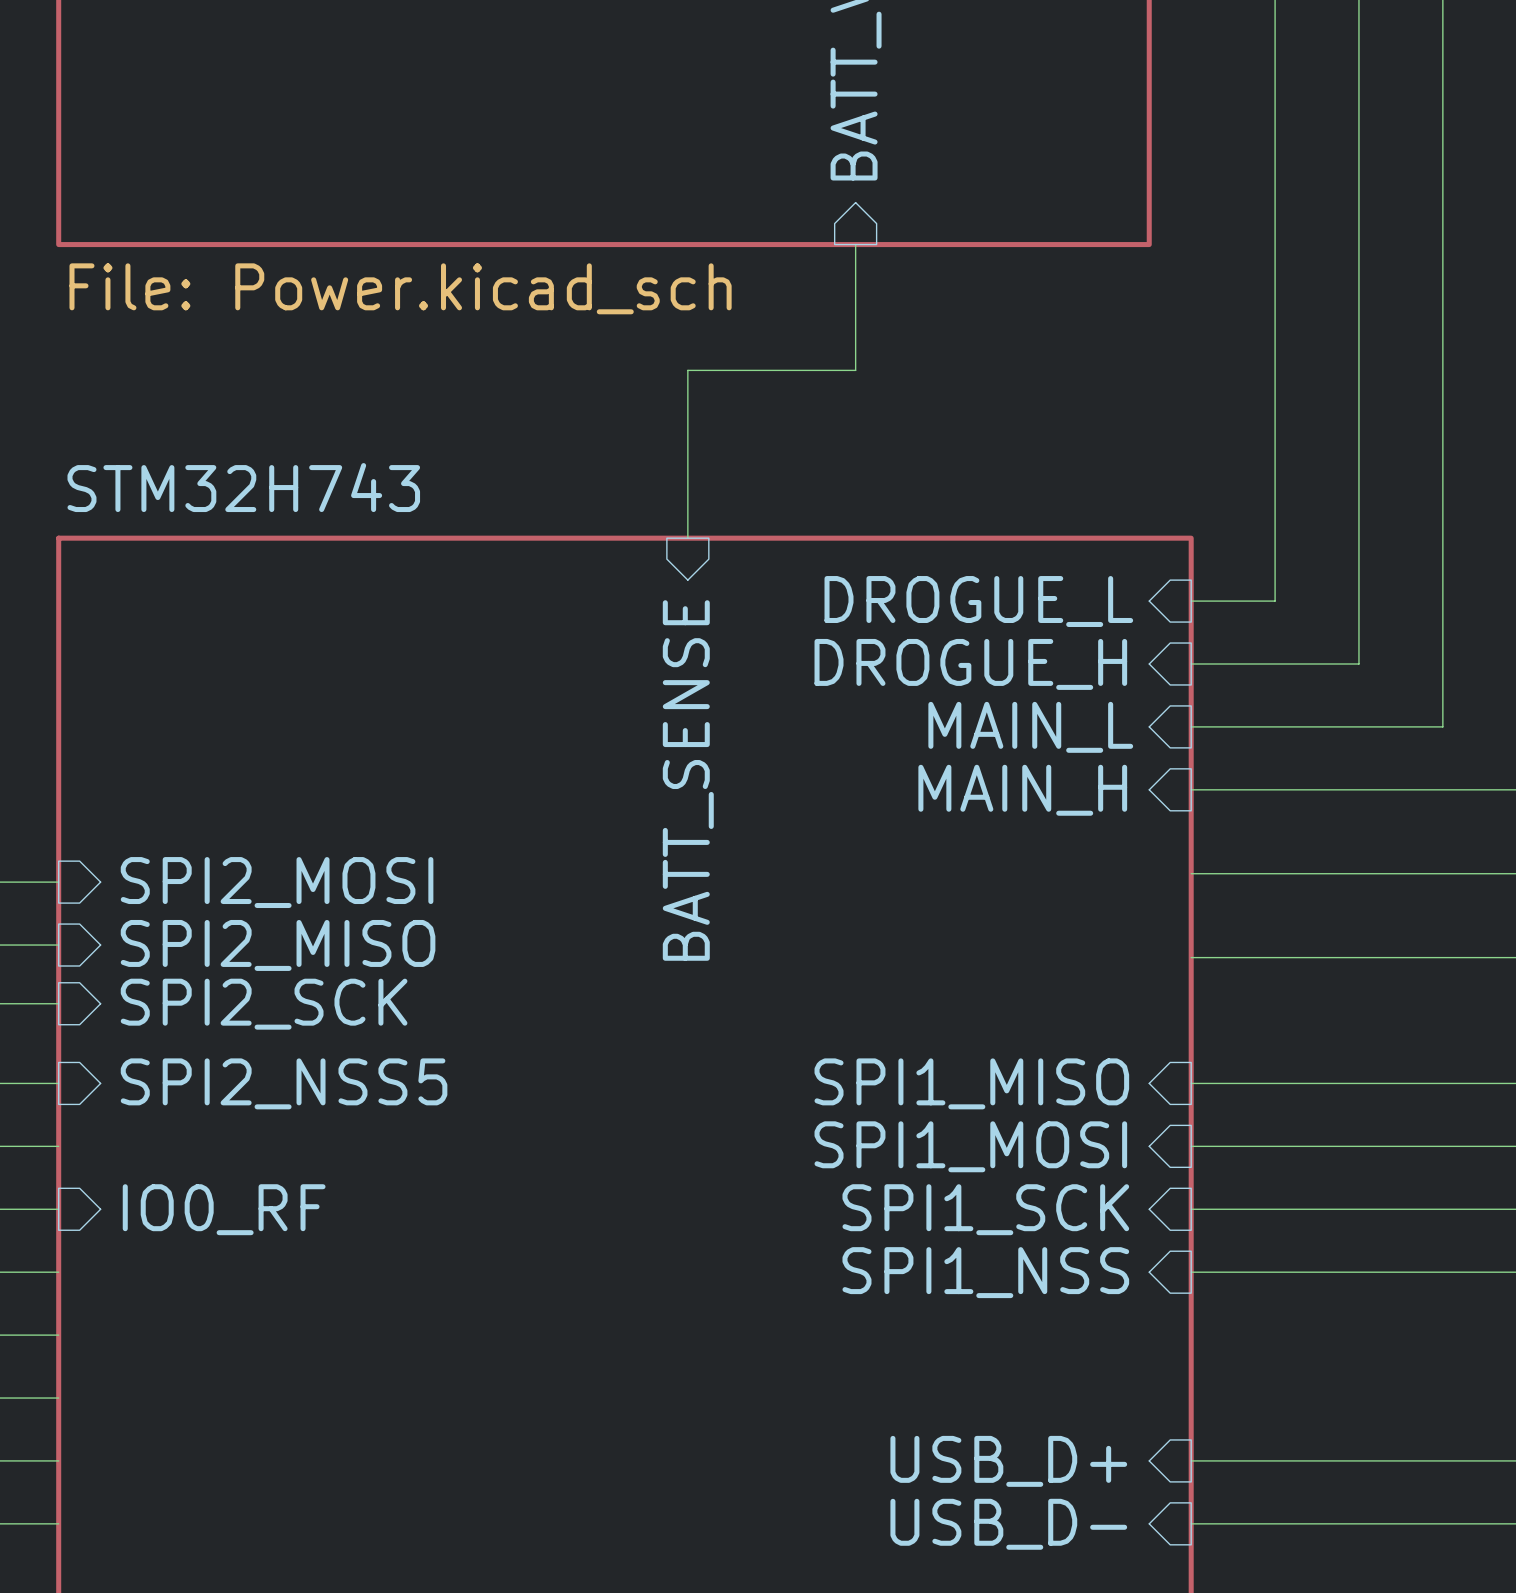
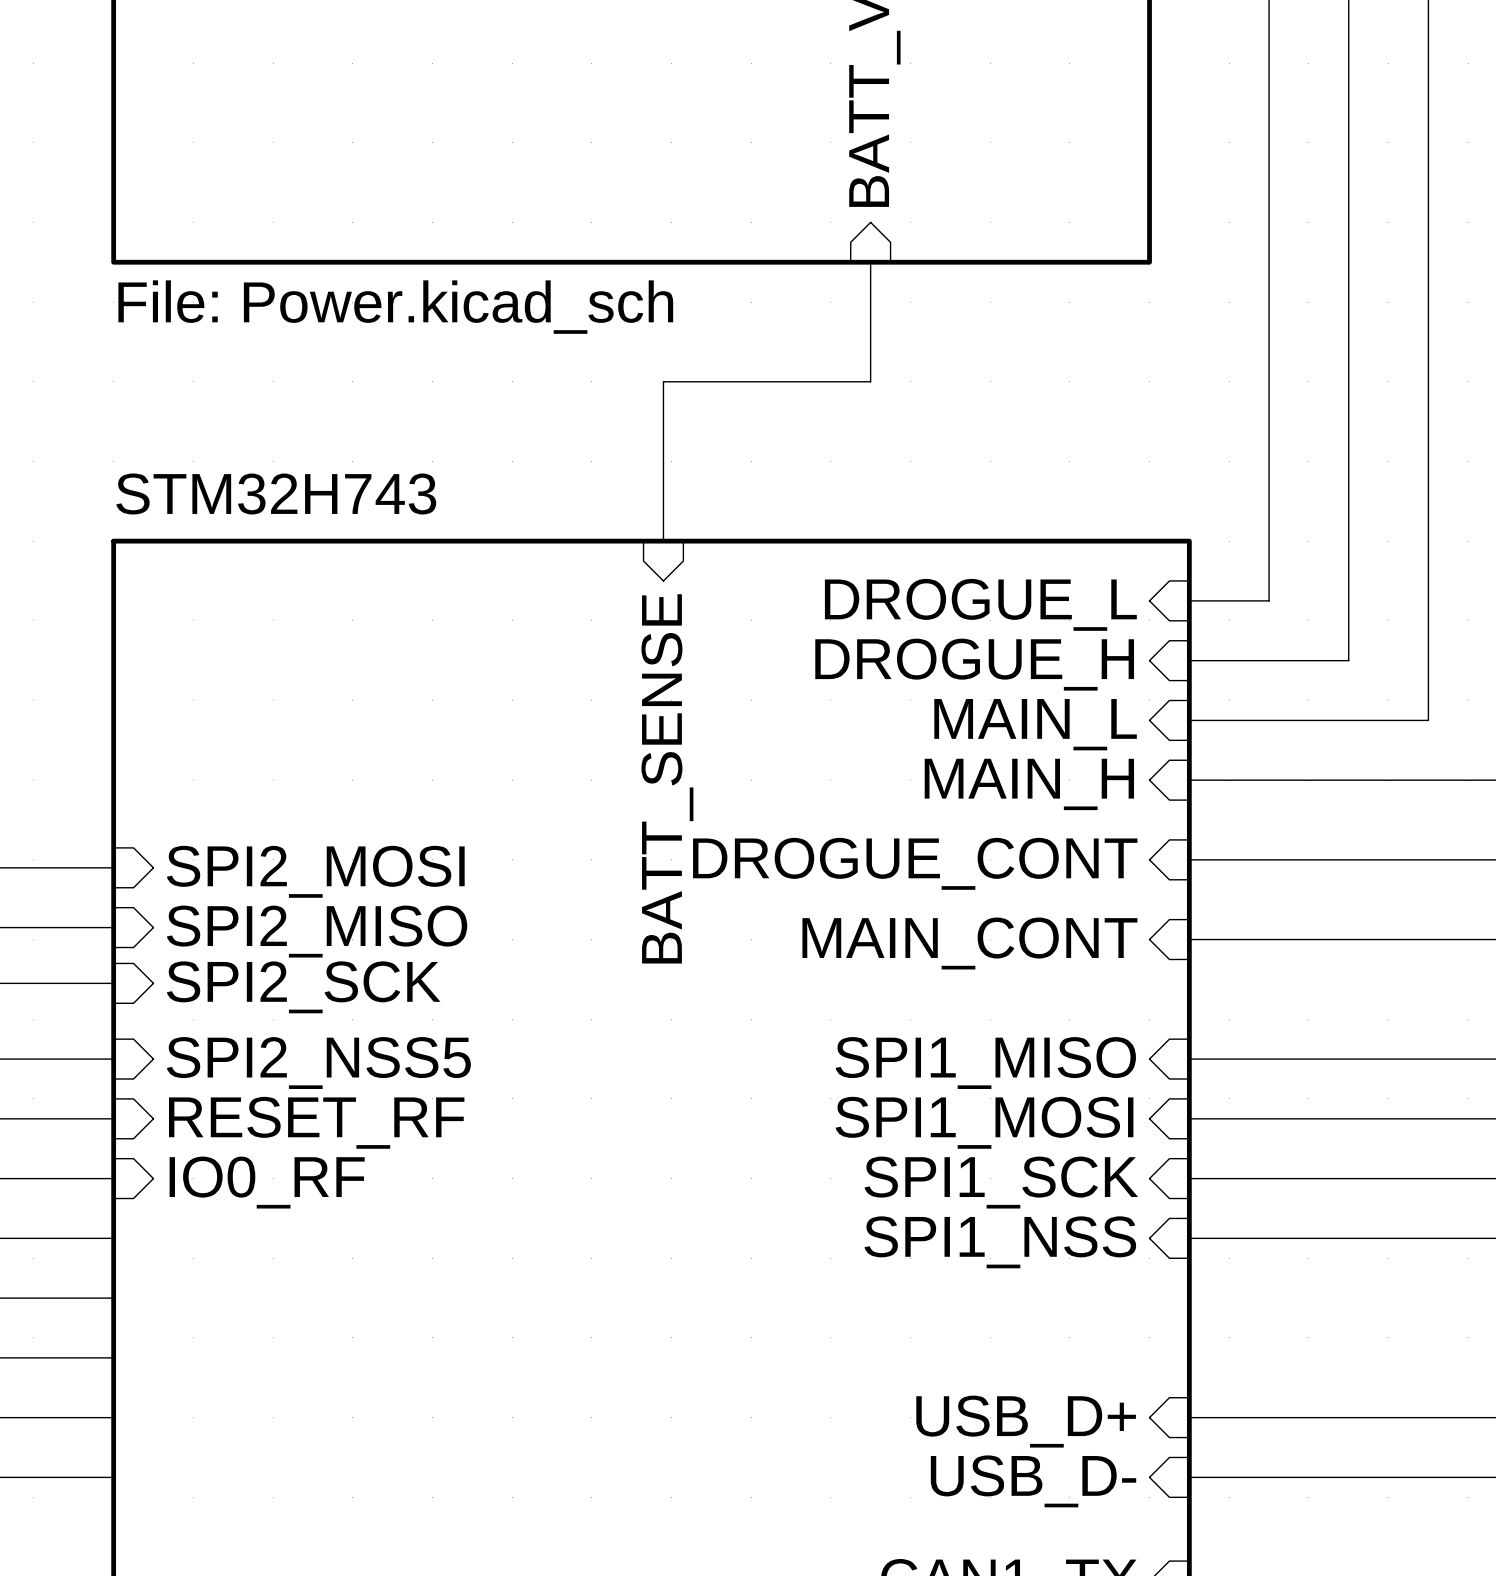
wire: (687, 370) (687, 538) -> (711, 381) (663, 381) (663, 541)
sheet pin position: BATT_SENSE (688, 780) -> BATT_SENSE (667, 778)
sheet pin: none -> DROGUE_CONT (915, 863)
sheet pin: none -> MAIN_CONT (969, 943)
sheet pin: none -> RESET_RF (316, 1122)

